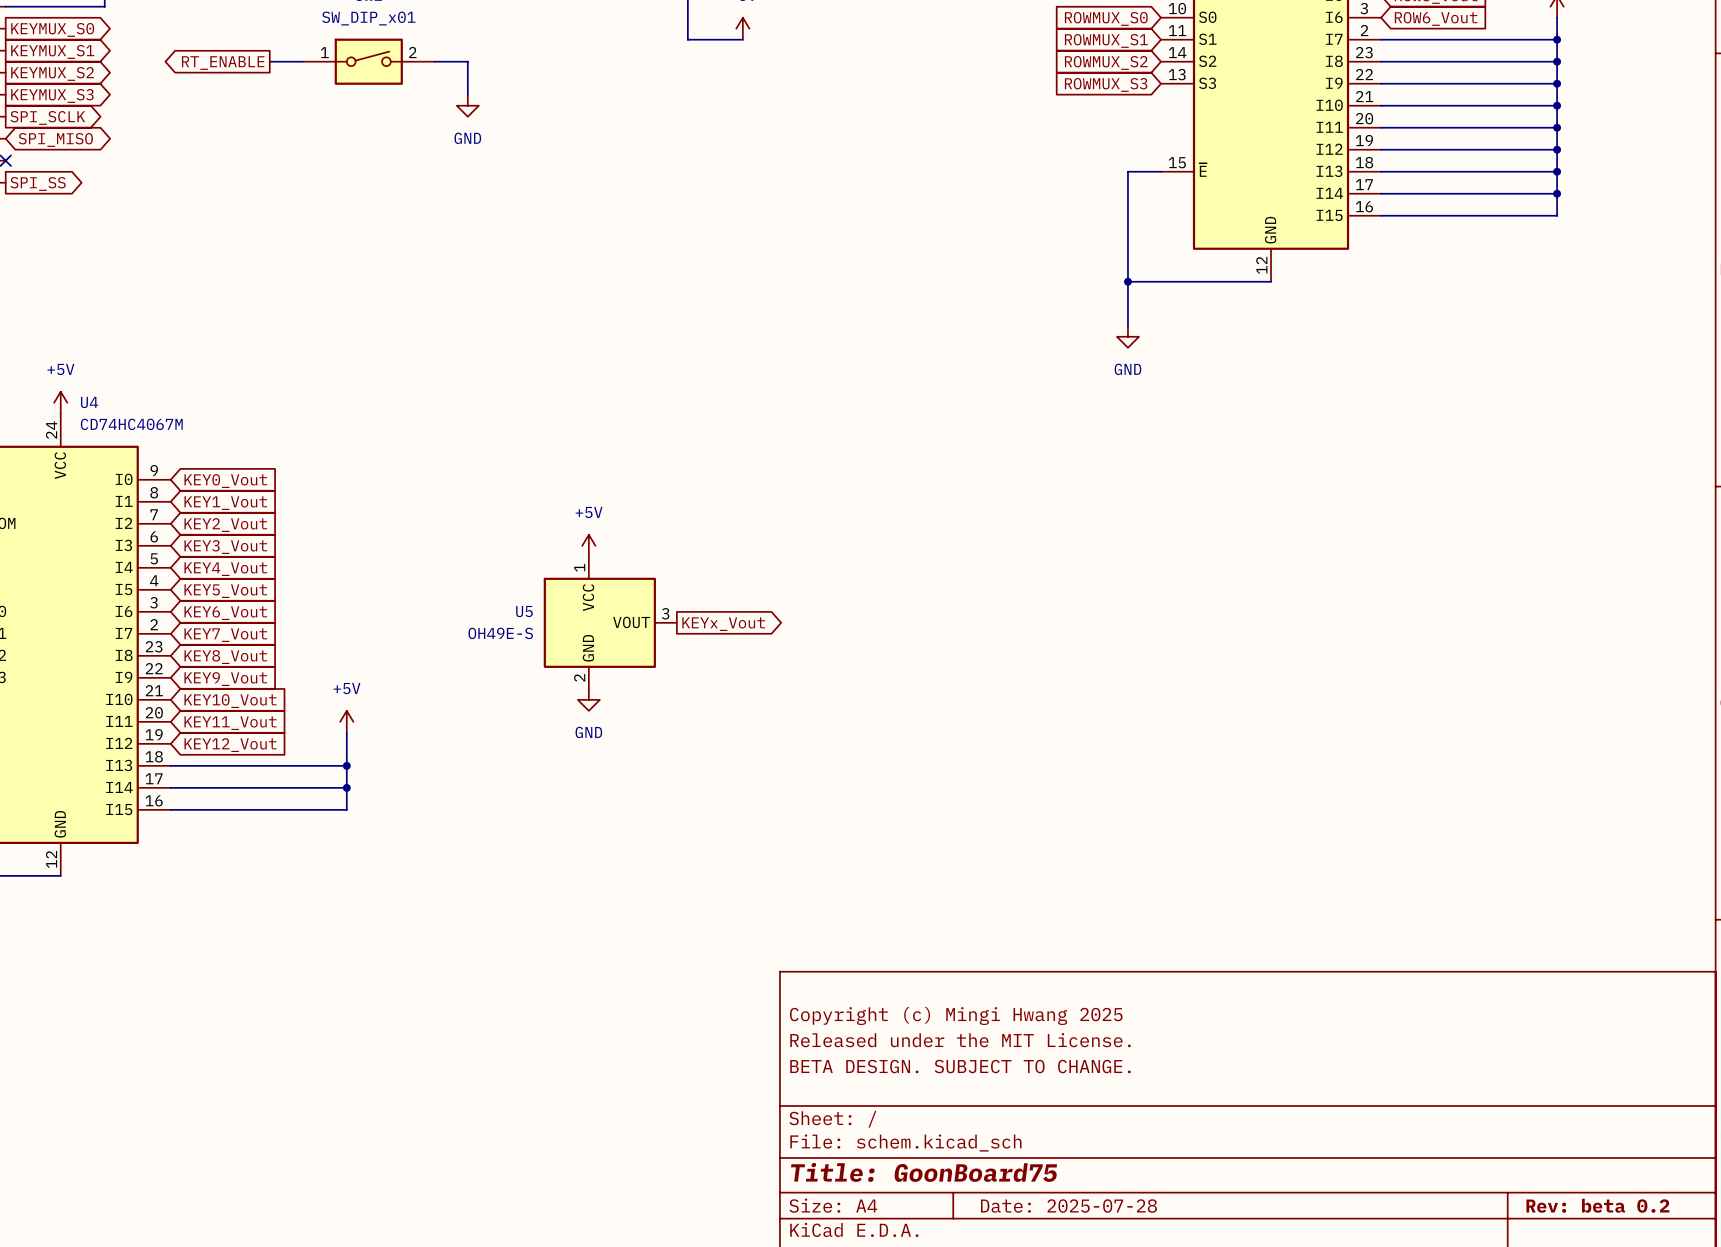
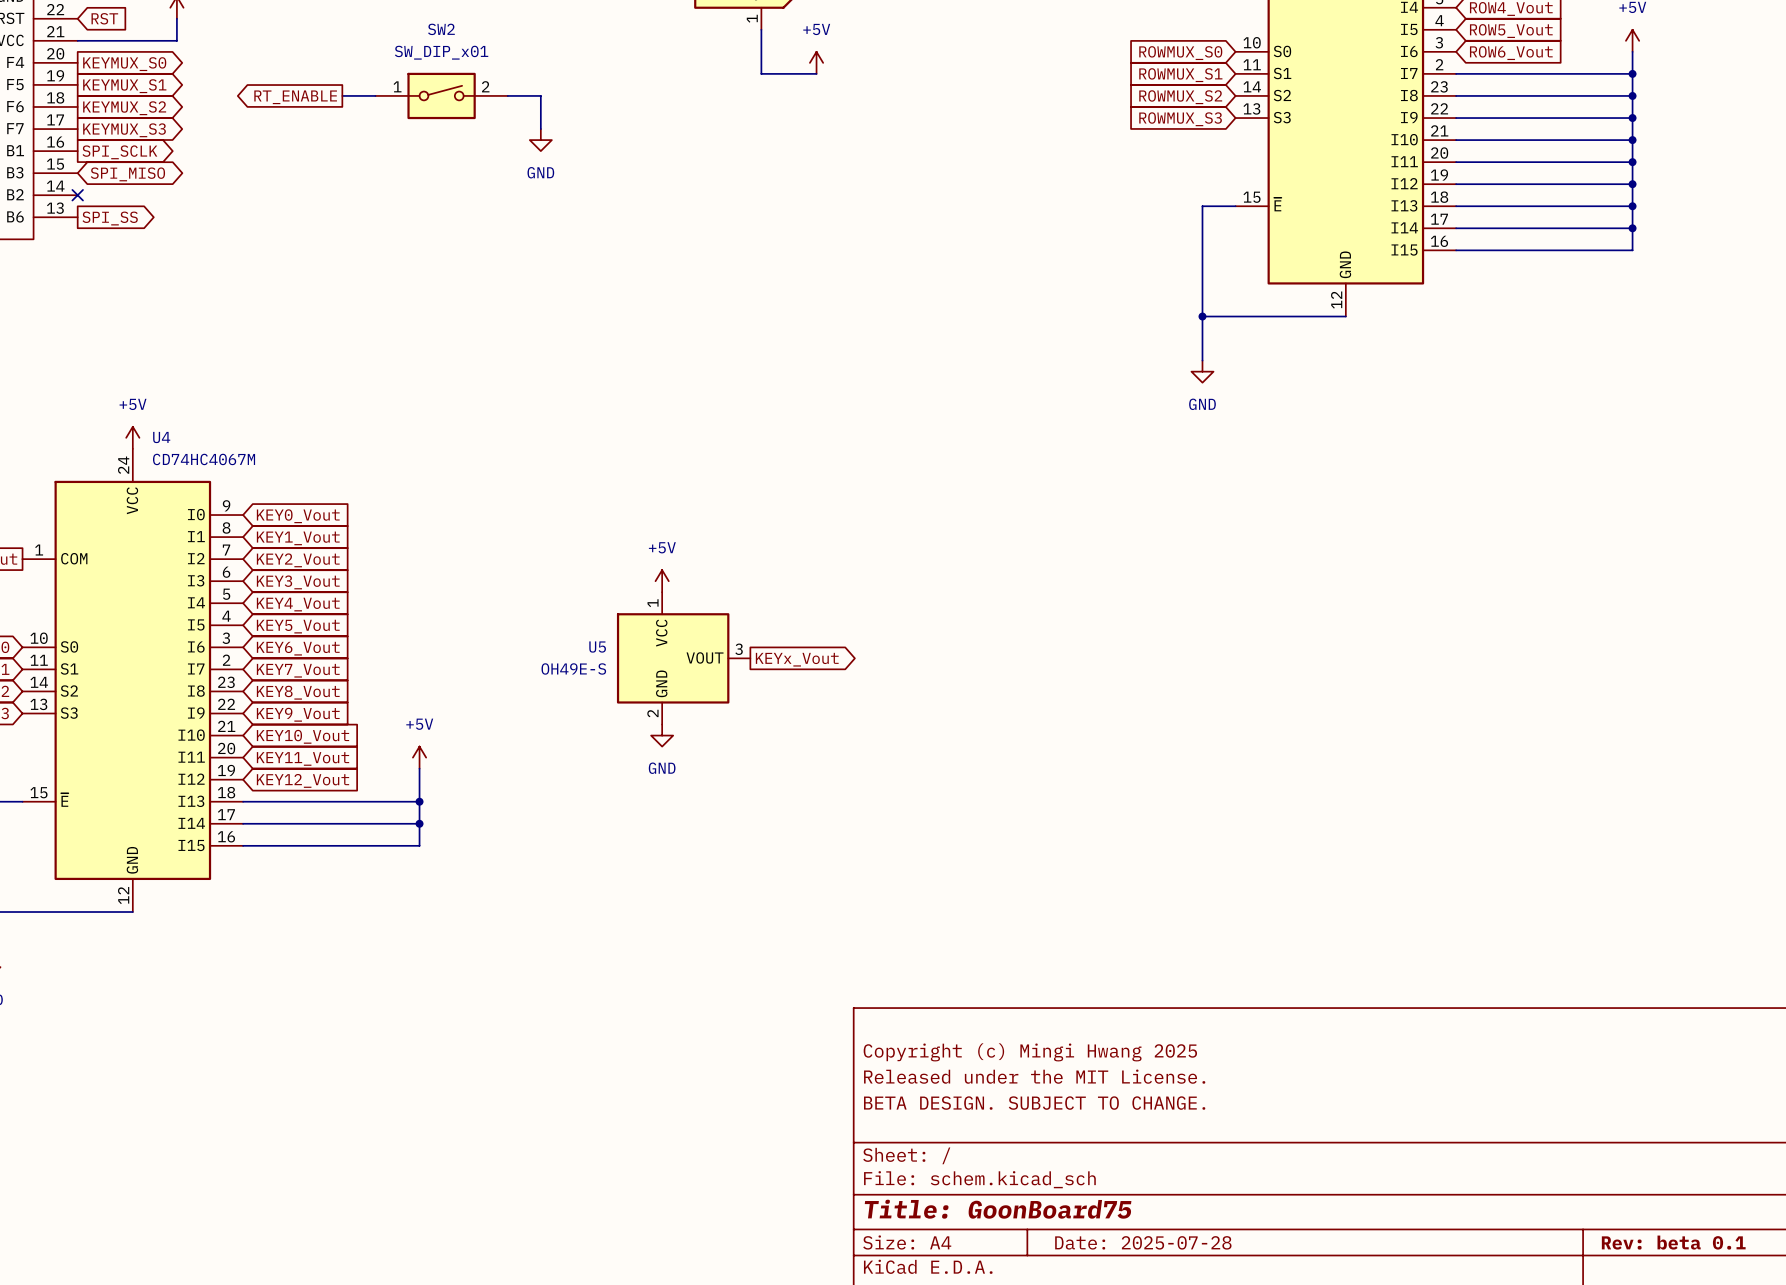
title block: Rev: beta 0.2 (1597, 1205) -> Rev: beta 0.1 (1673, 1242)

